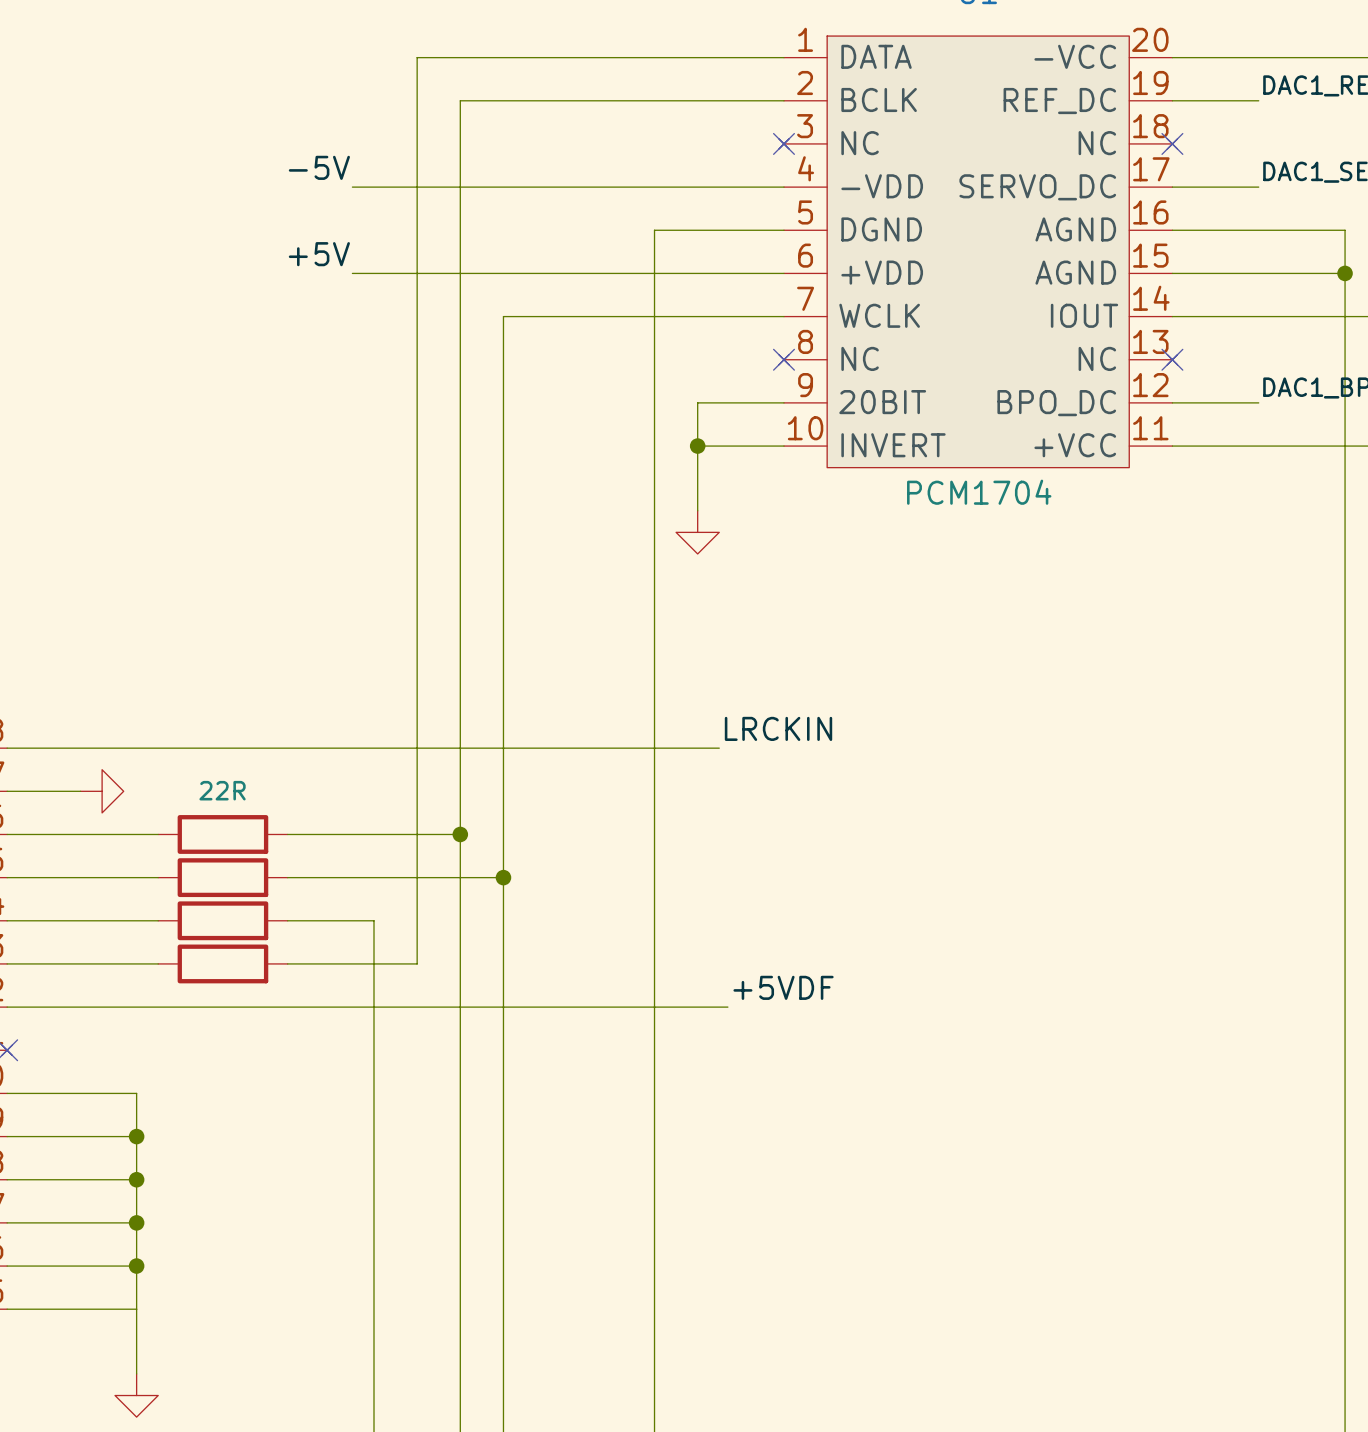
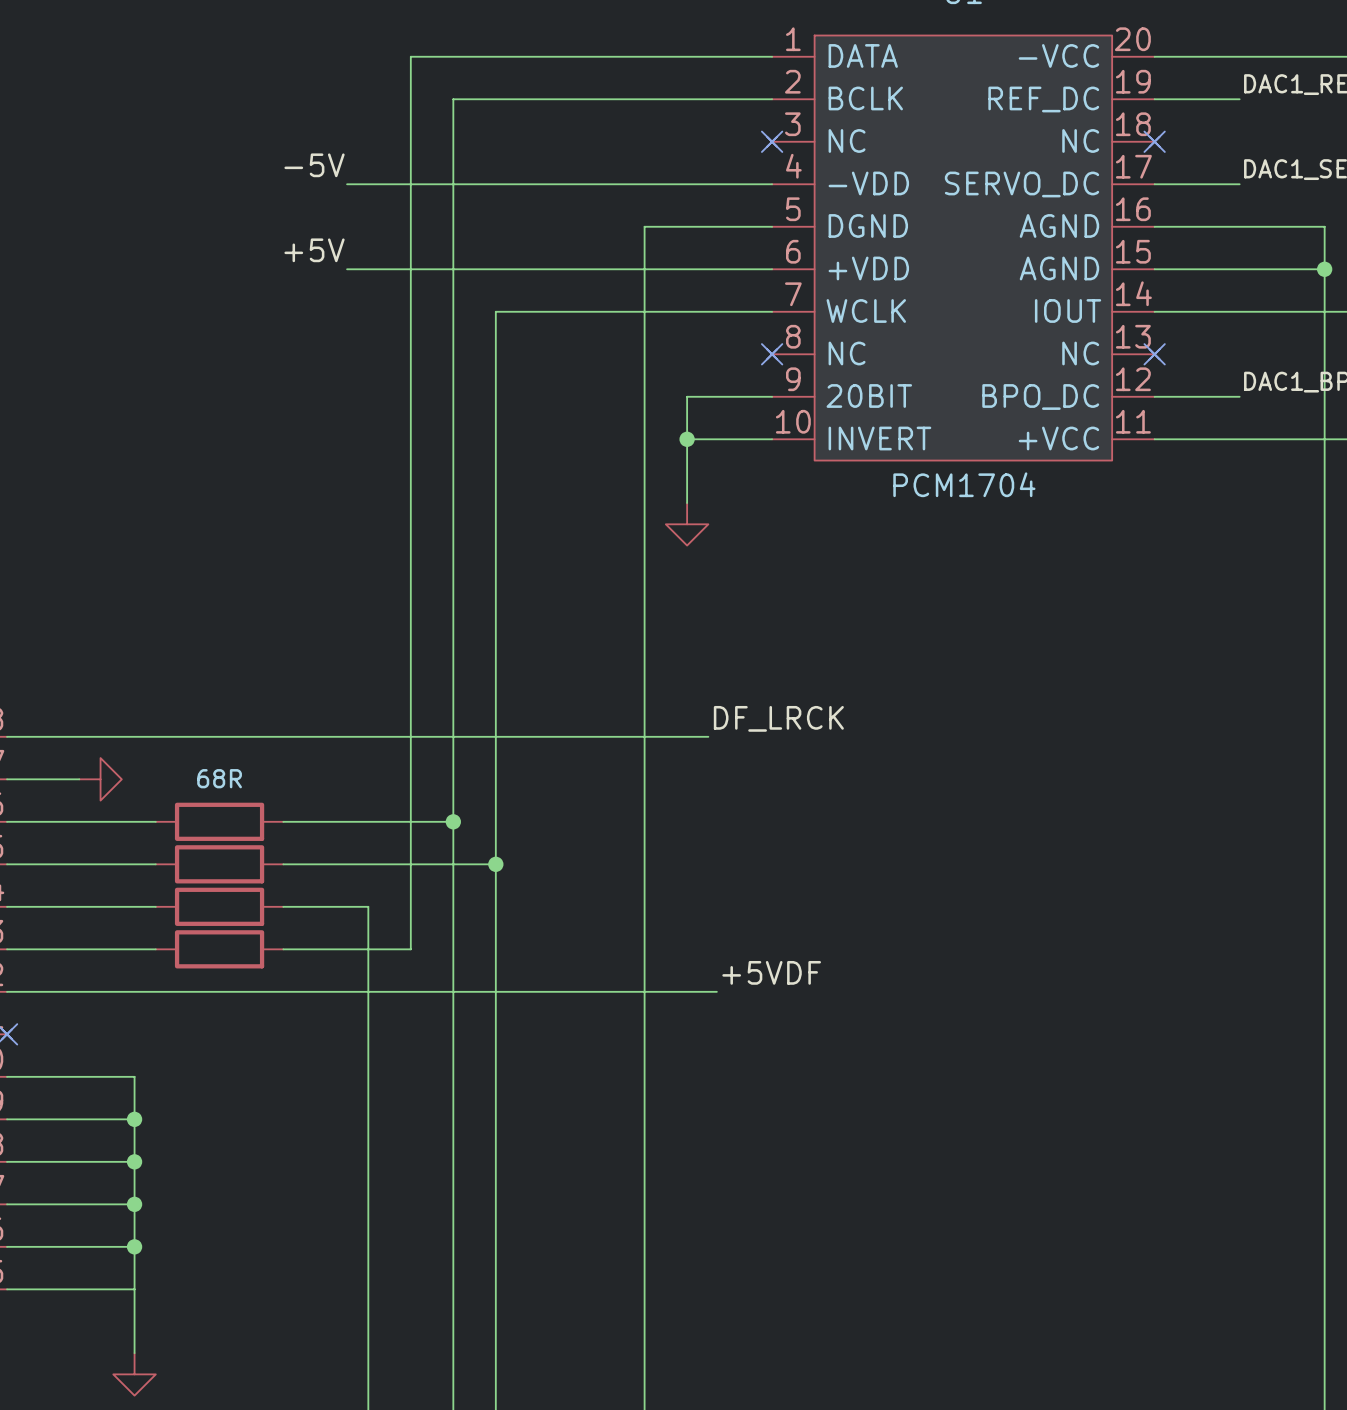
label: LRCKIN (778, 728) -> DF_LRCK (778, 718)
part value: 22R (222, 790) -> 68R (219, 778)

